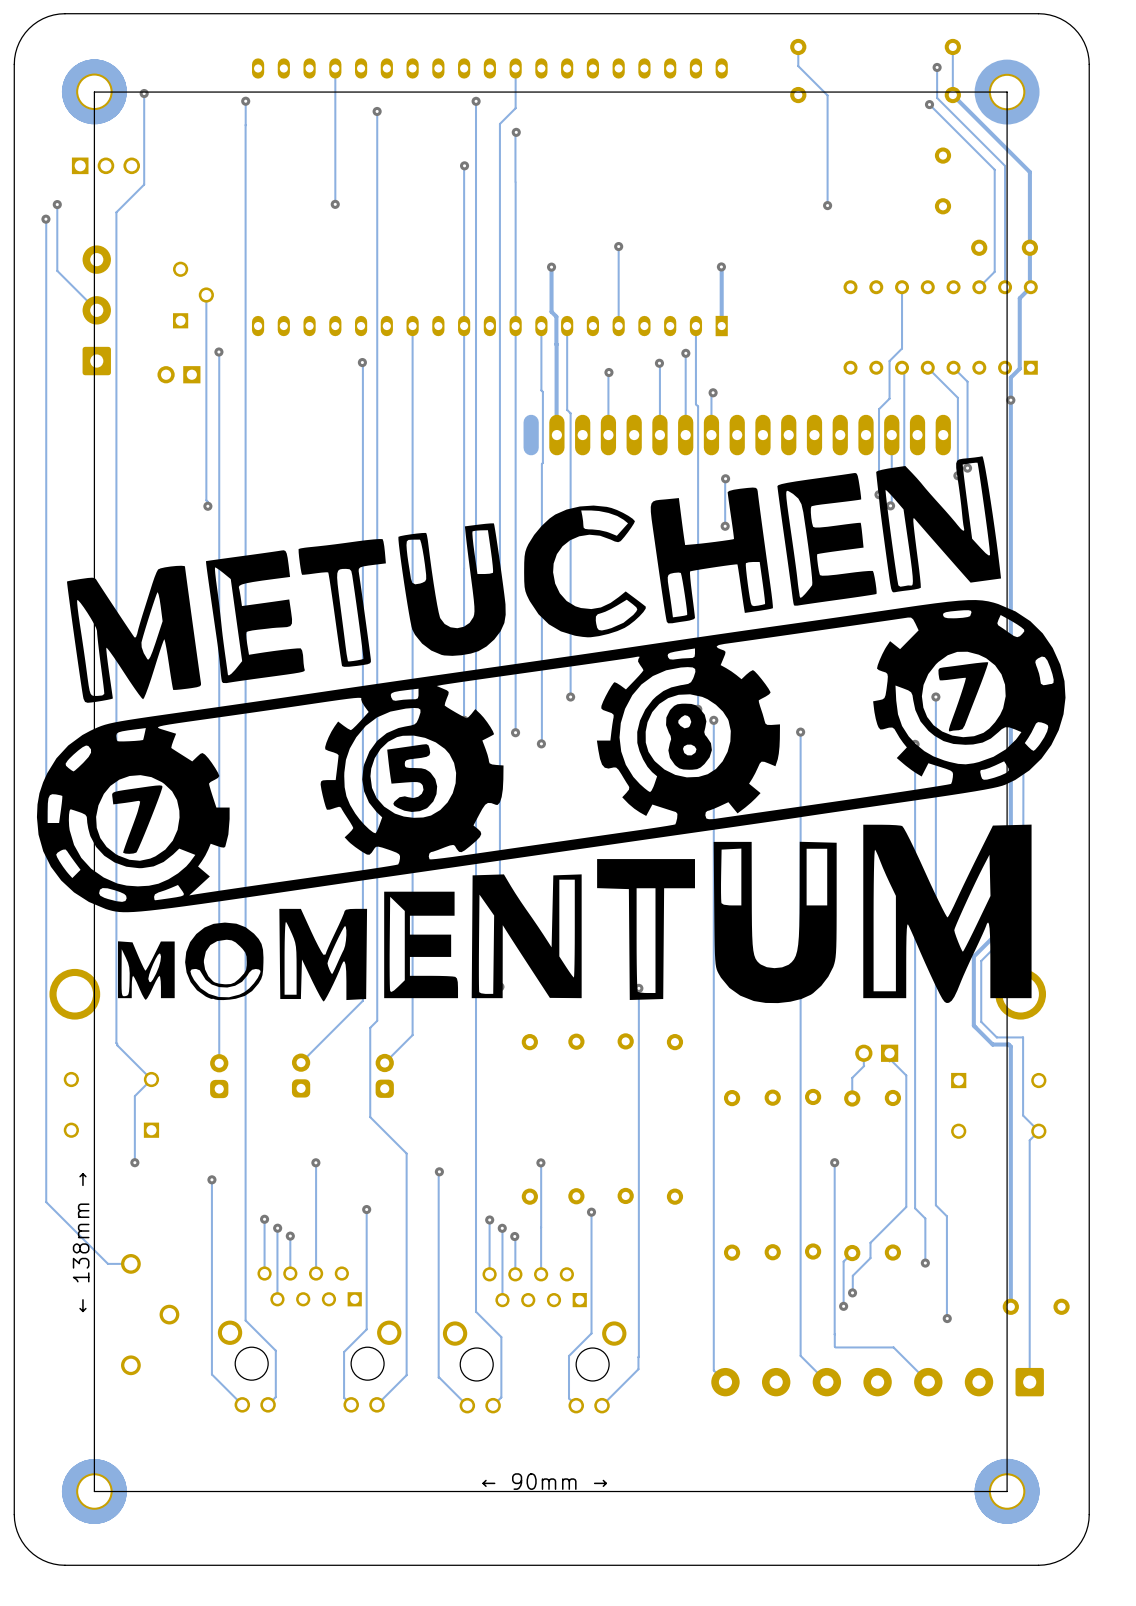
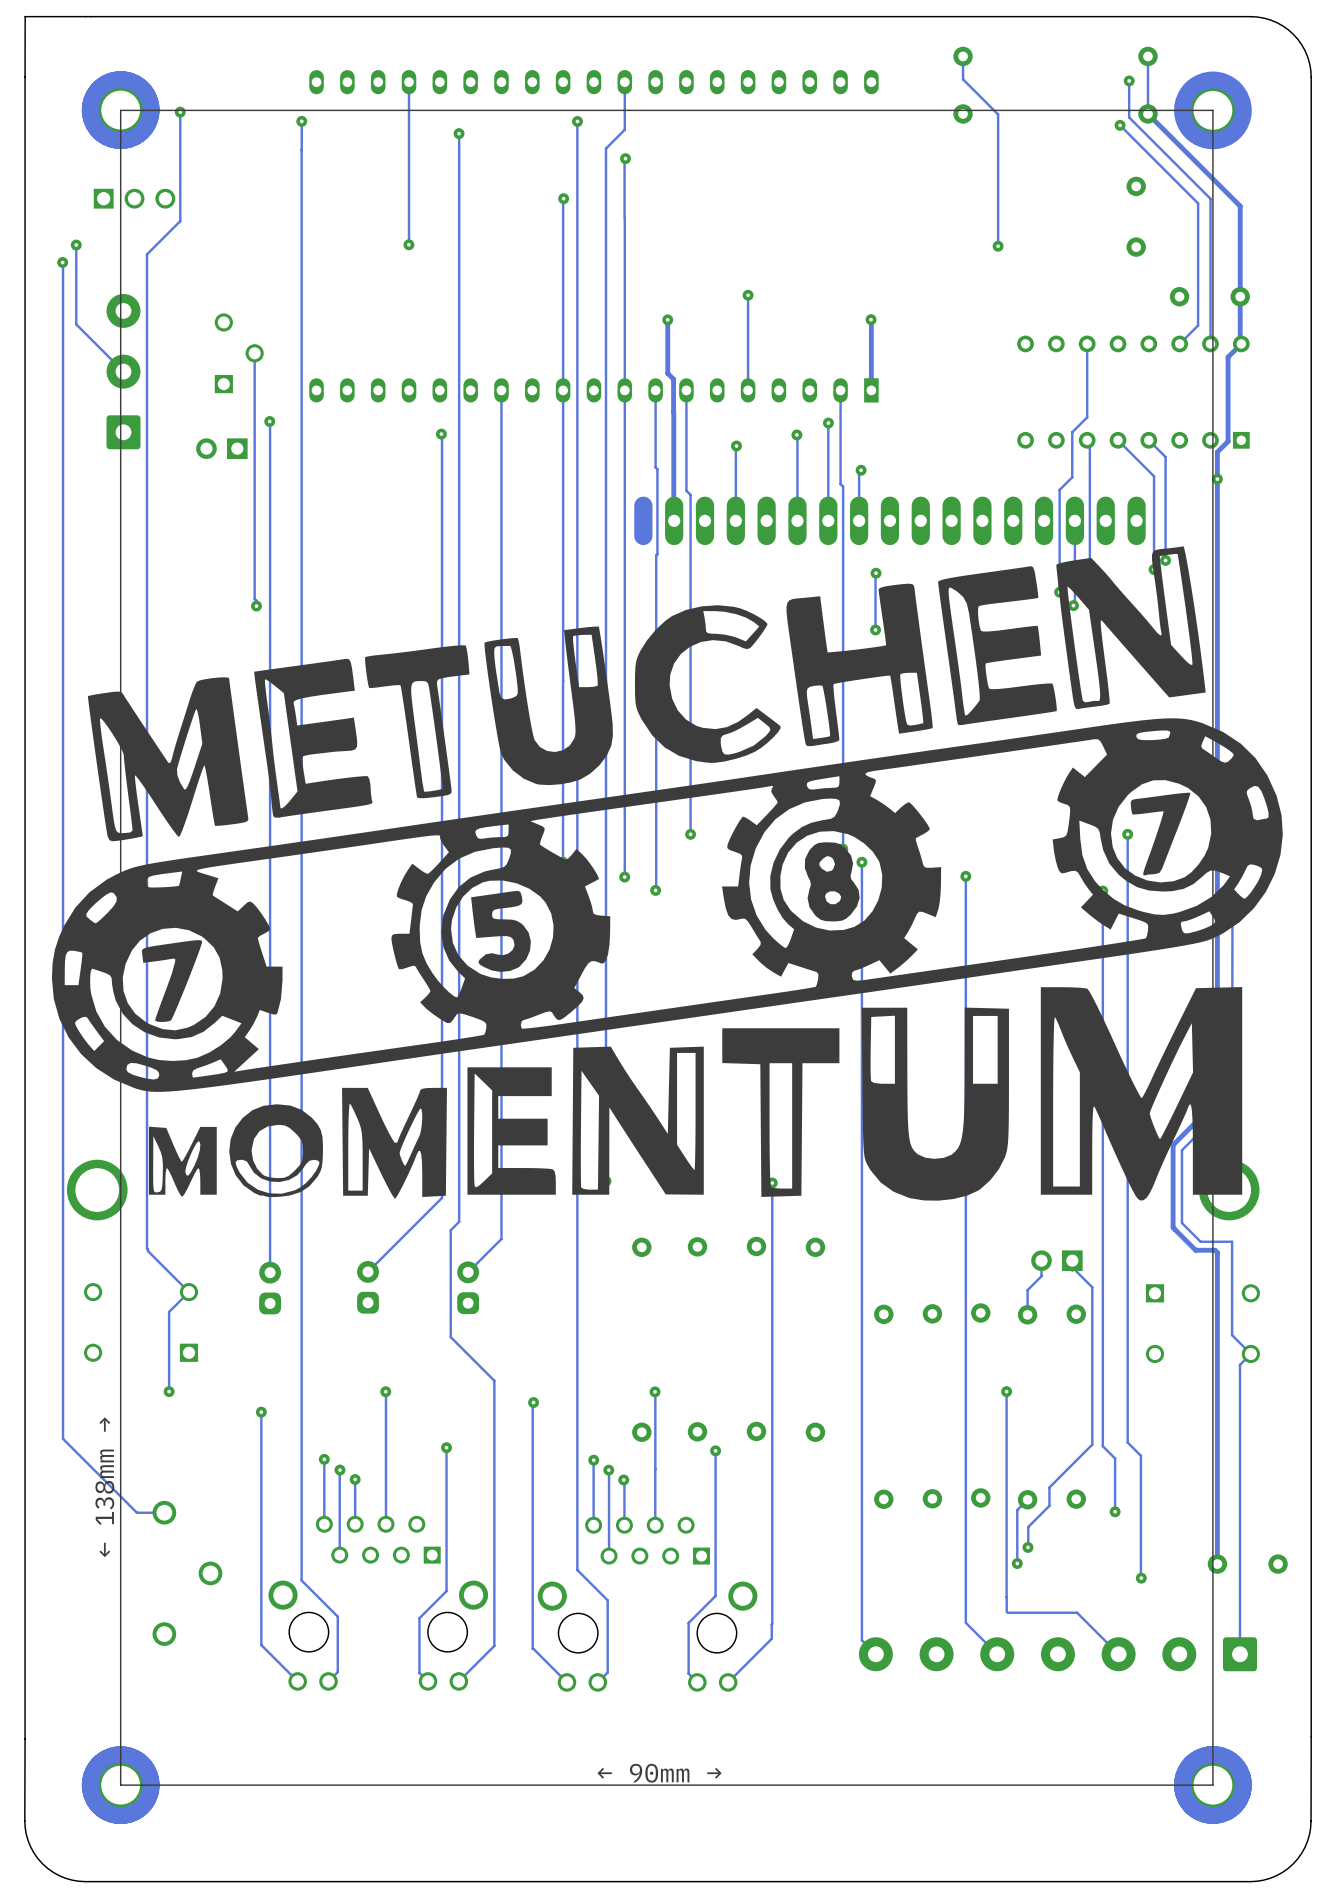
board edge: (64, 13) (48, 16) (29, 28) (17, 47) (14, 64) (14, 1514) (17, 1531) (25, 1546) (42, 1560) (64, 1565) (1044, 1564) (1055, 1562) (1070, 1554) (1078, 1546) (1086, 1531) (1089, 1514) (1089, 1451) -> (85, 16) (25, 16) (24, 1820) (28, 1840) (38, 1858) (47, 1868) (59, 1875) (71, 1880) (85, 1881) (1257, 1881) (1276, 1875) (1288, 1868) (1301, 1853) (1307, 1841) (1311, 1821) (1311, 1736)

